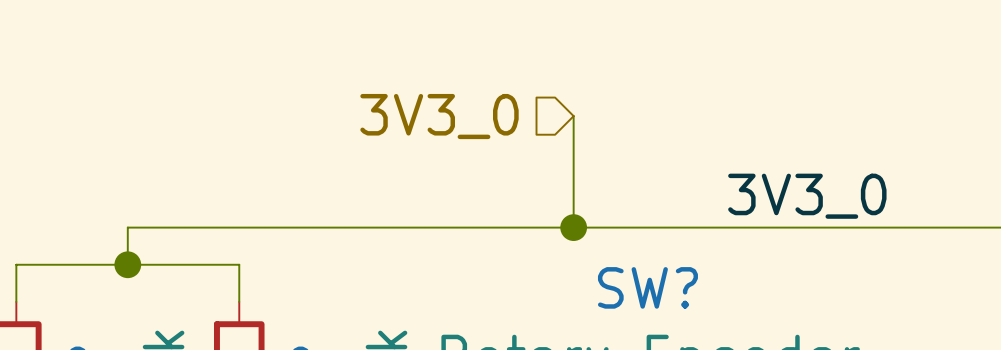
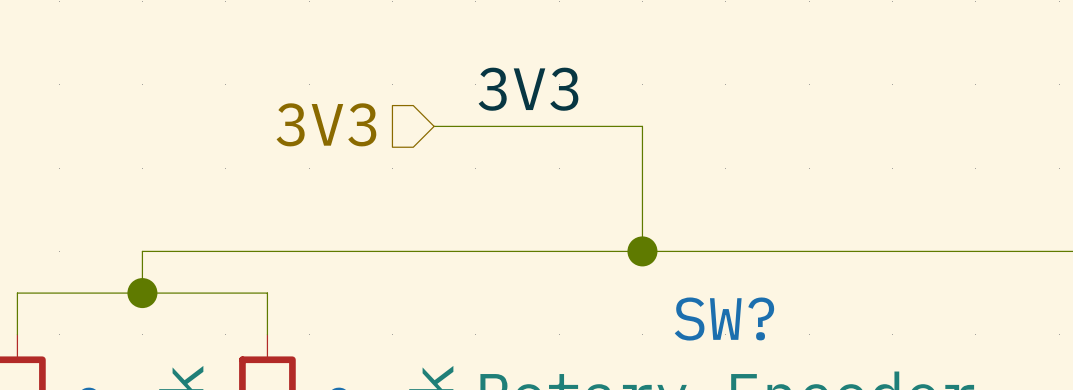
label: none -> 3V3 (528, 89)
wire: none -> (434, 126) (642, 126)
hierarchical label: 3V3_0 (439, 116) -> 3V3 (326, 124)
label: 3V3_0 (807, 196) -> none

